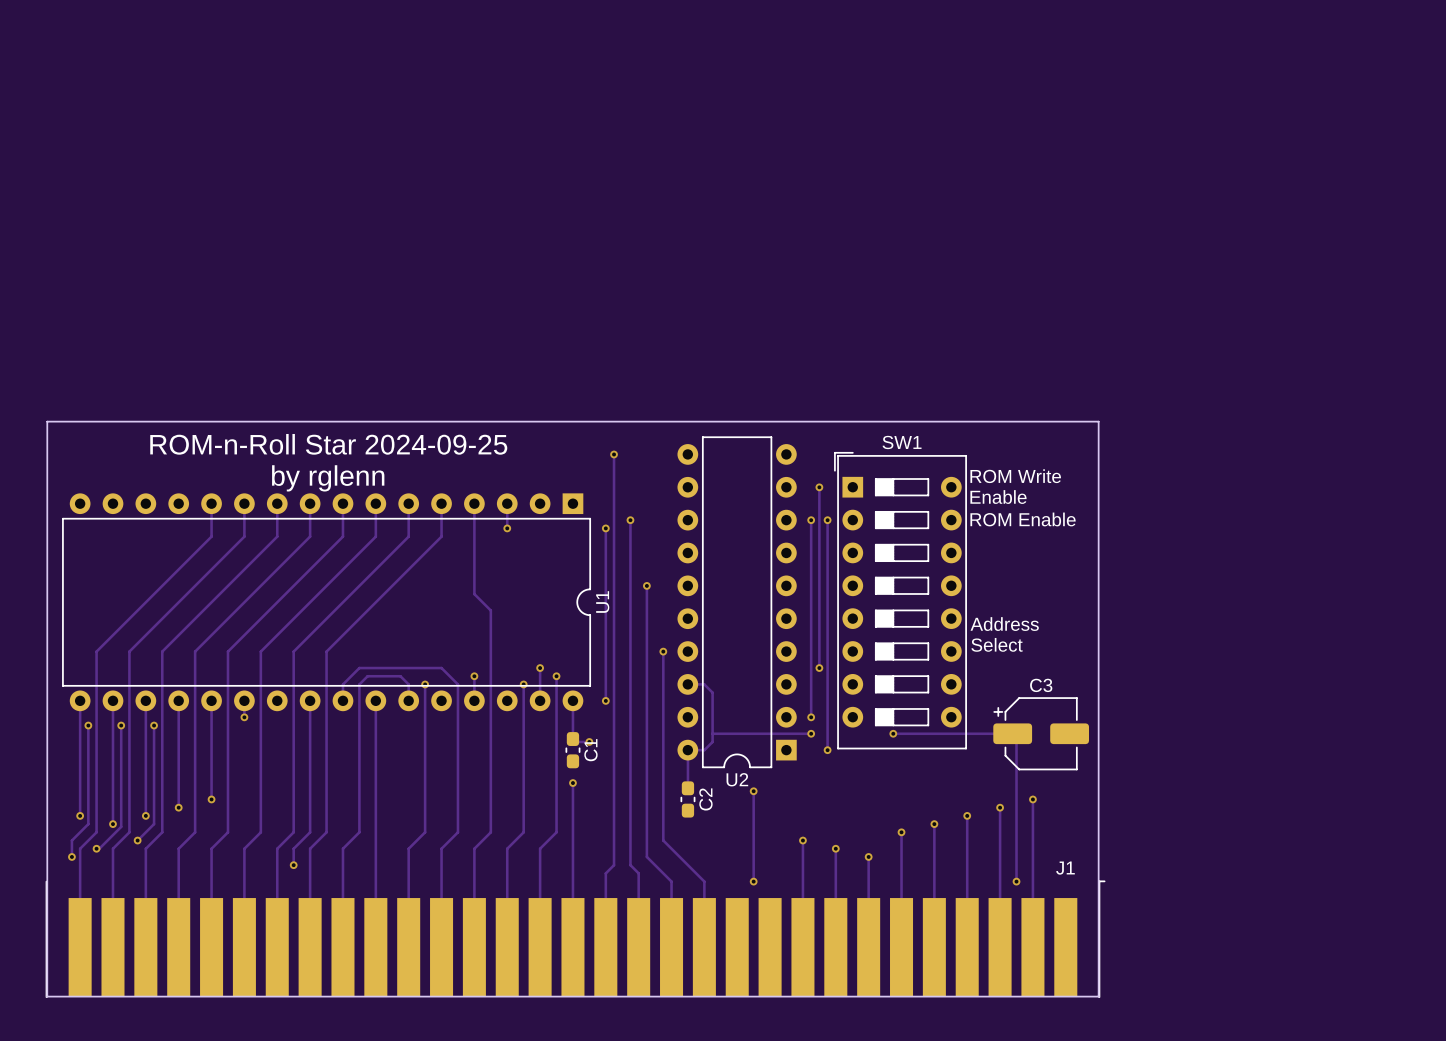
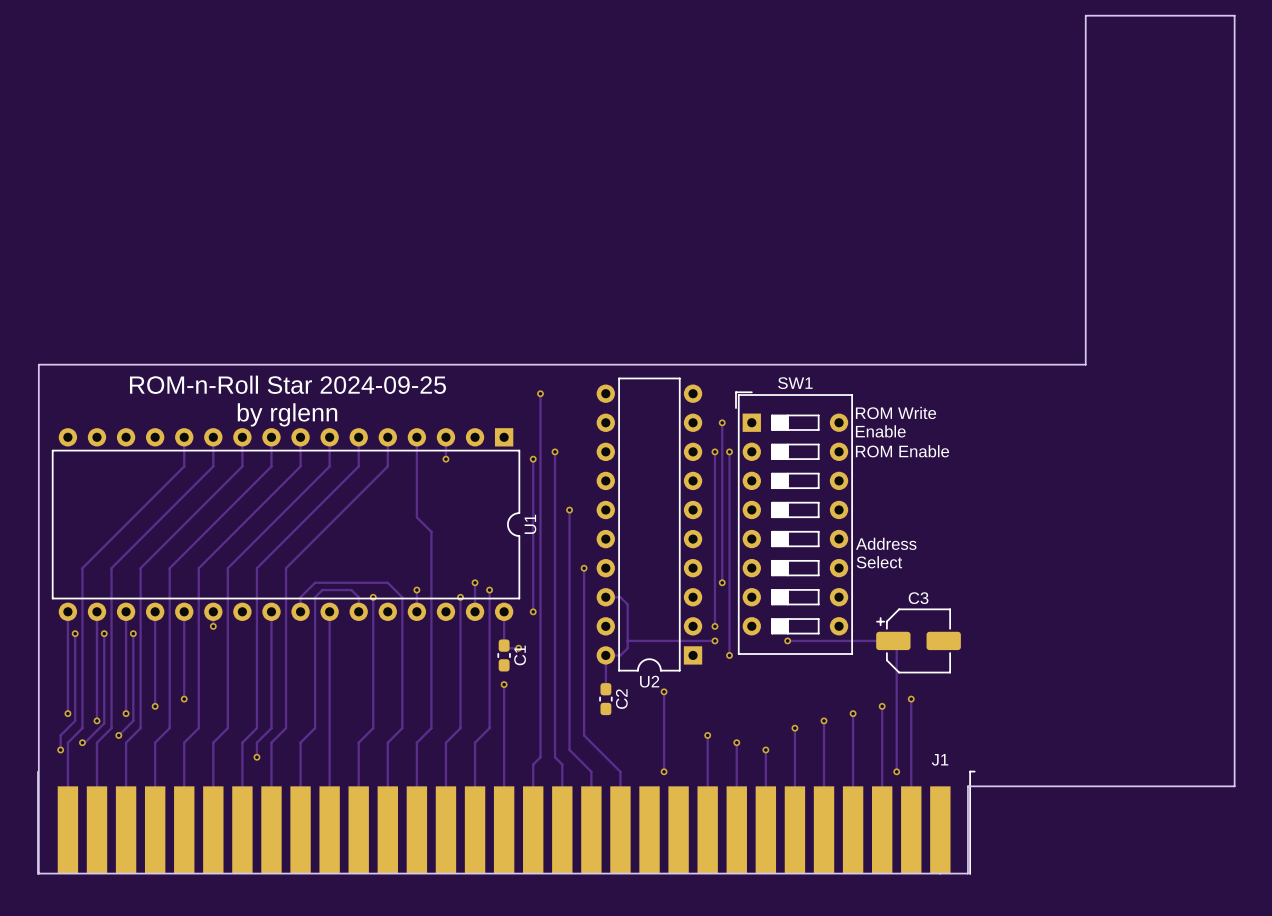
board edge: (1098, 421) (1098, 996) (1097, 996) -> (969, 364) (1085, 364) (1085, 15) (1234, 15) (1234, 786) (967, 786) (967, 873)

